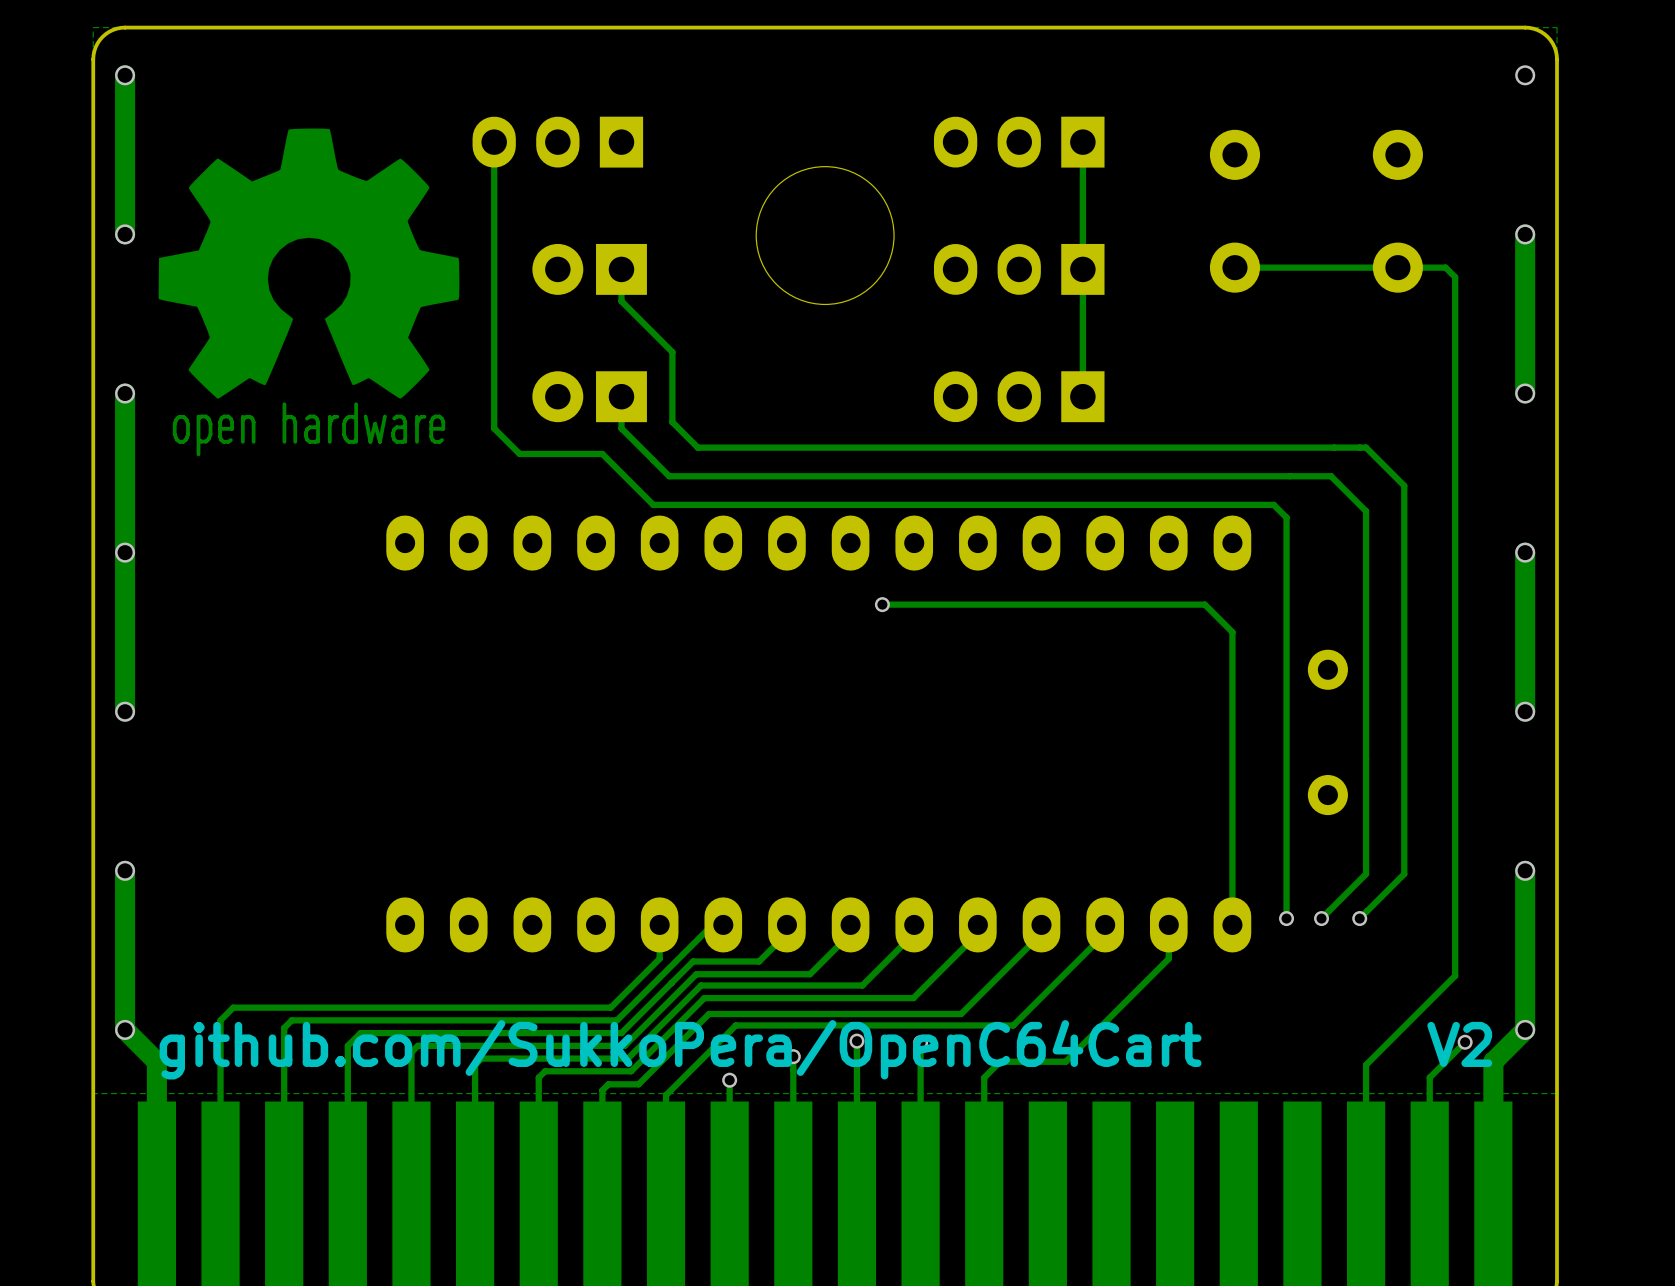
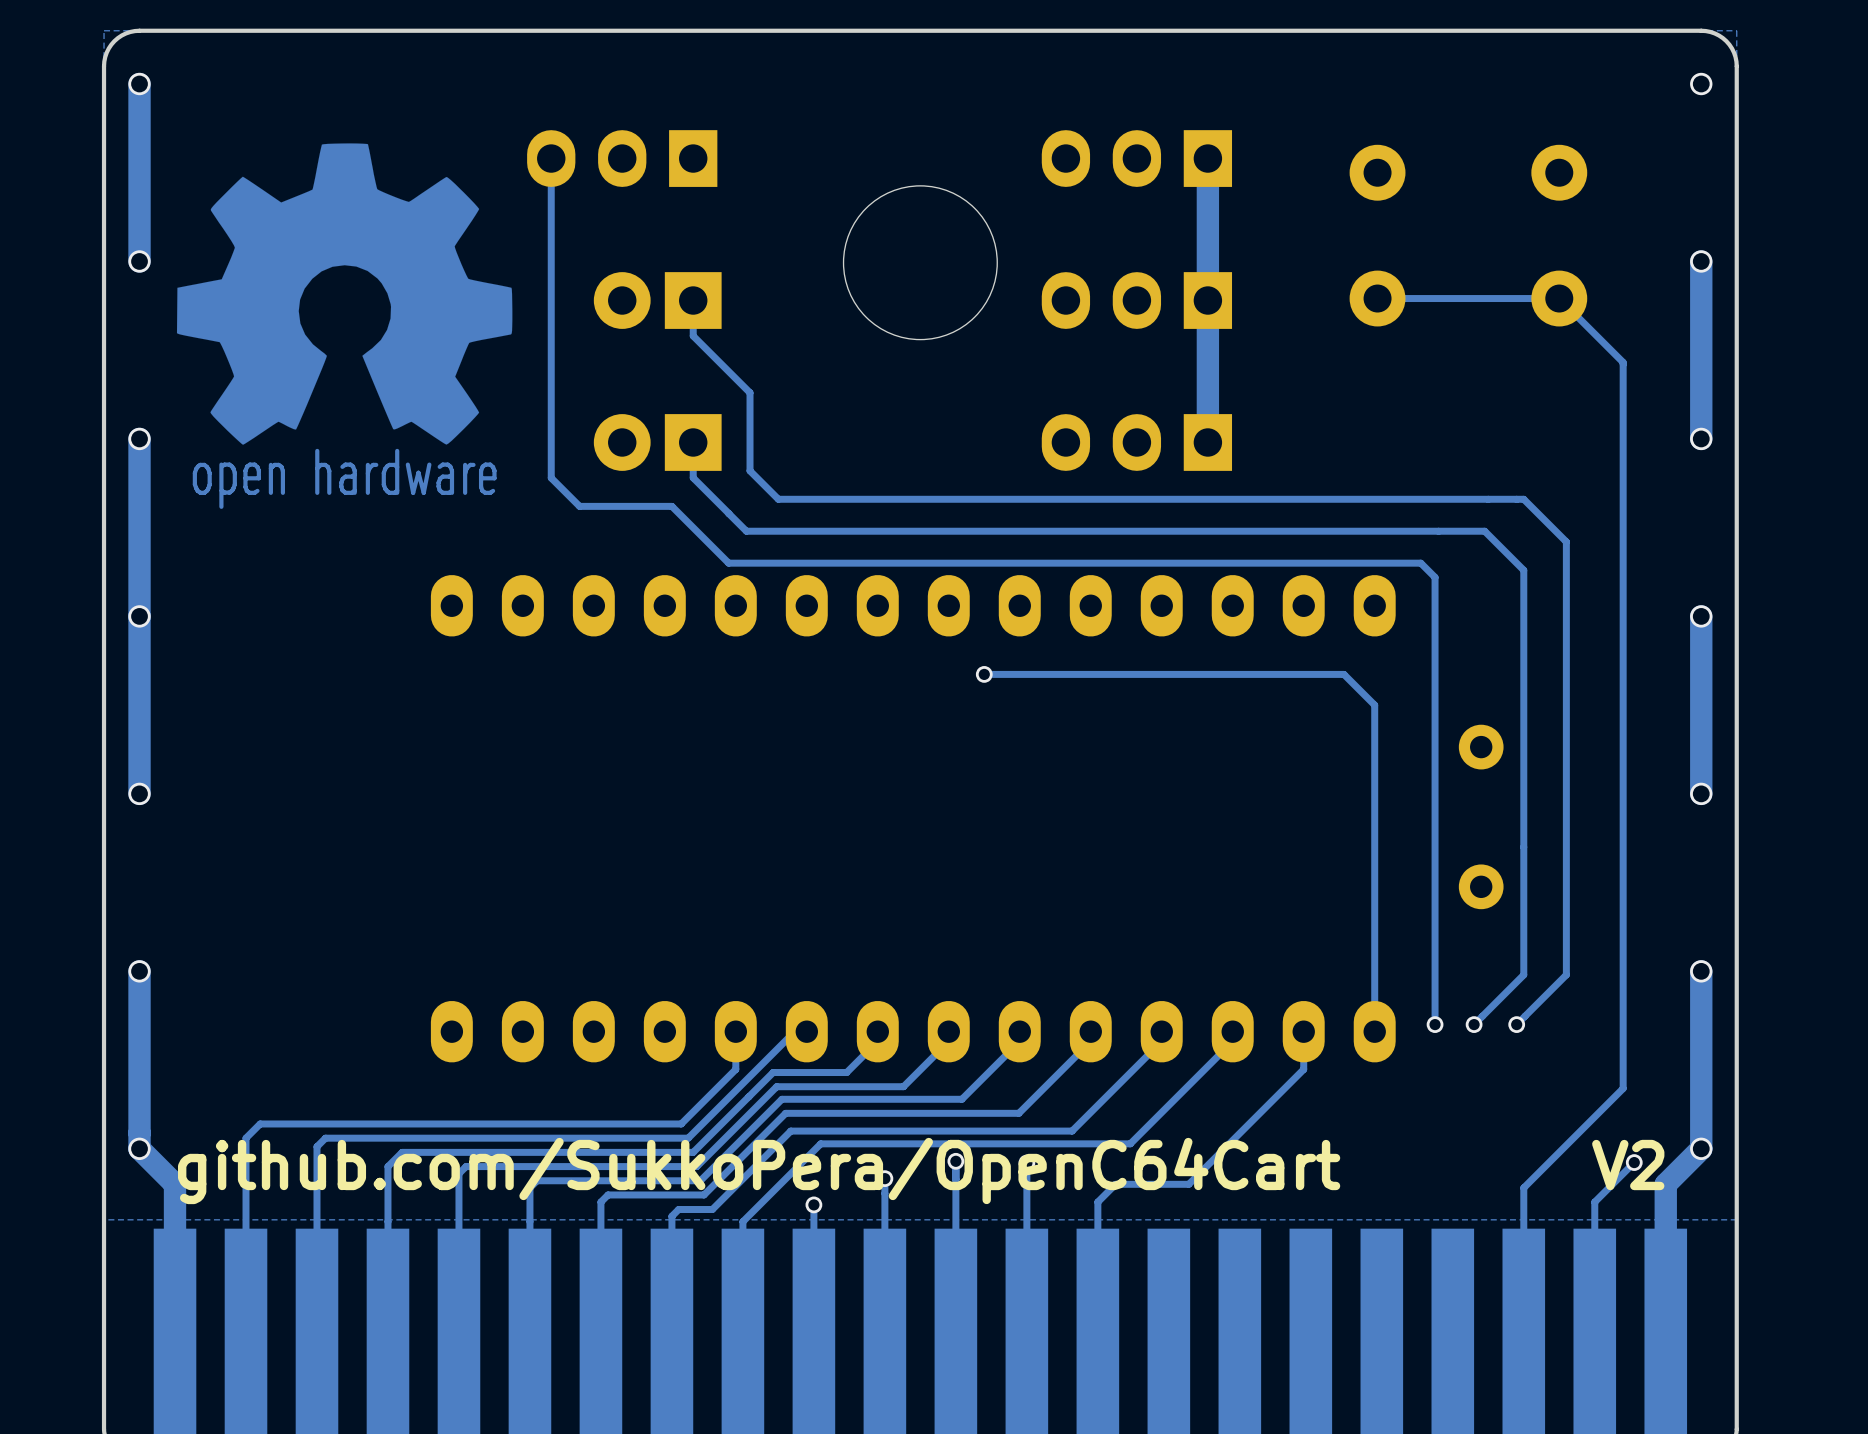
track width: thin (1082, 142) (1082, 396) -> thick (1207, 158) (1207, 442)
track: (1397, 267) (1445, 267) (1455, 277) (1455, 324) -> (1559, 298) (1623, 362)

